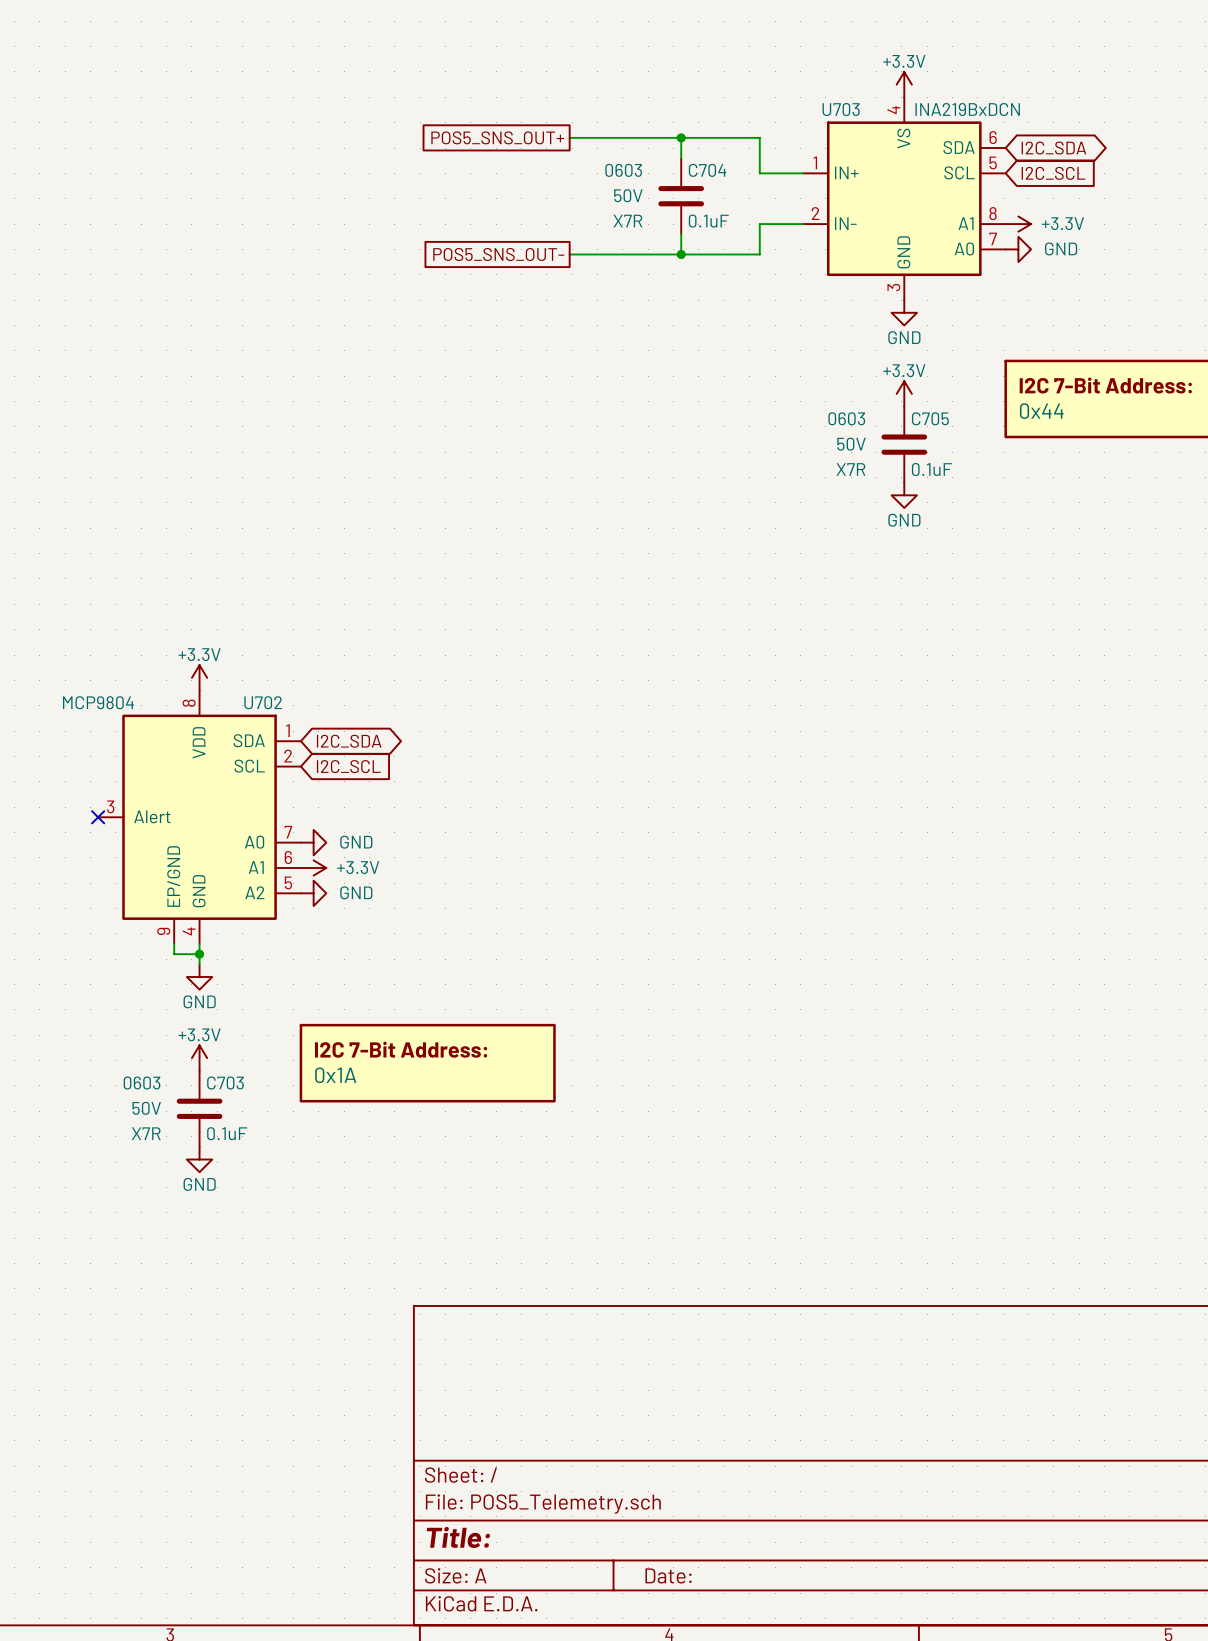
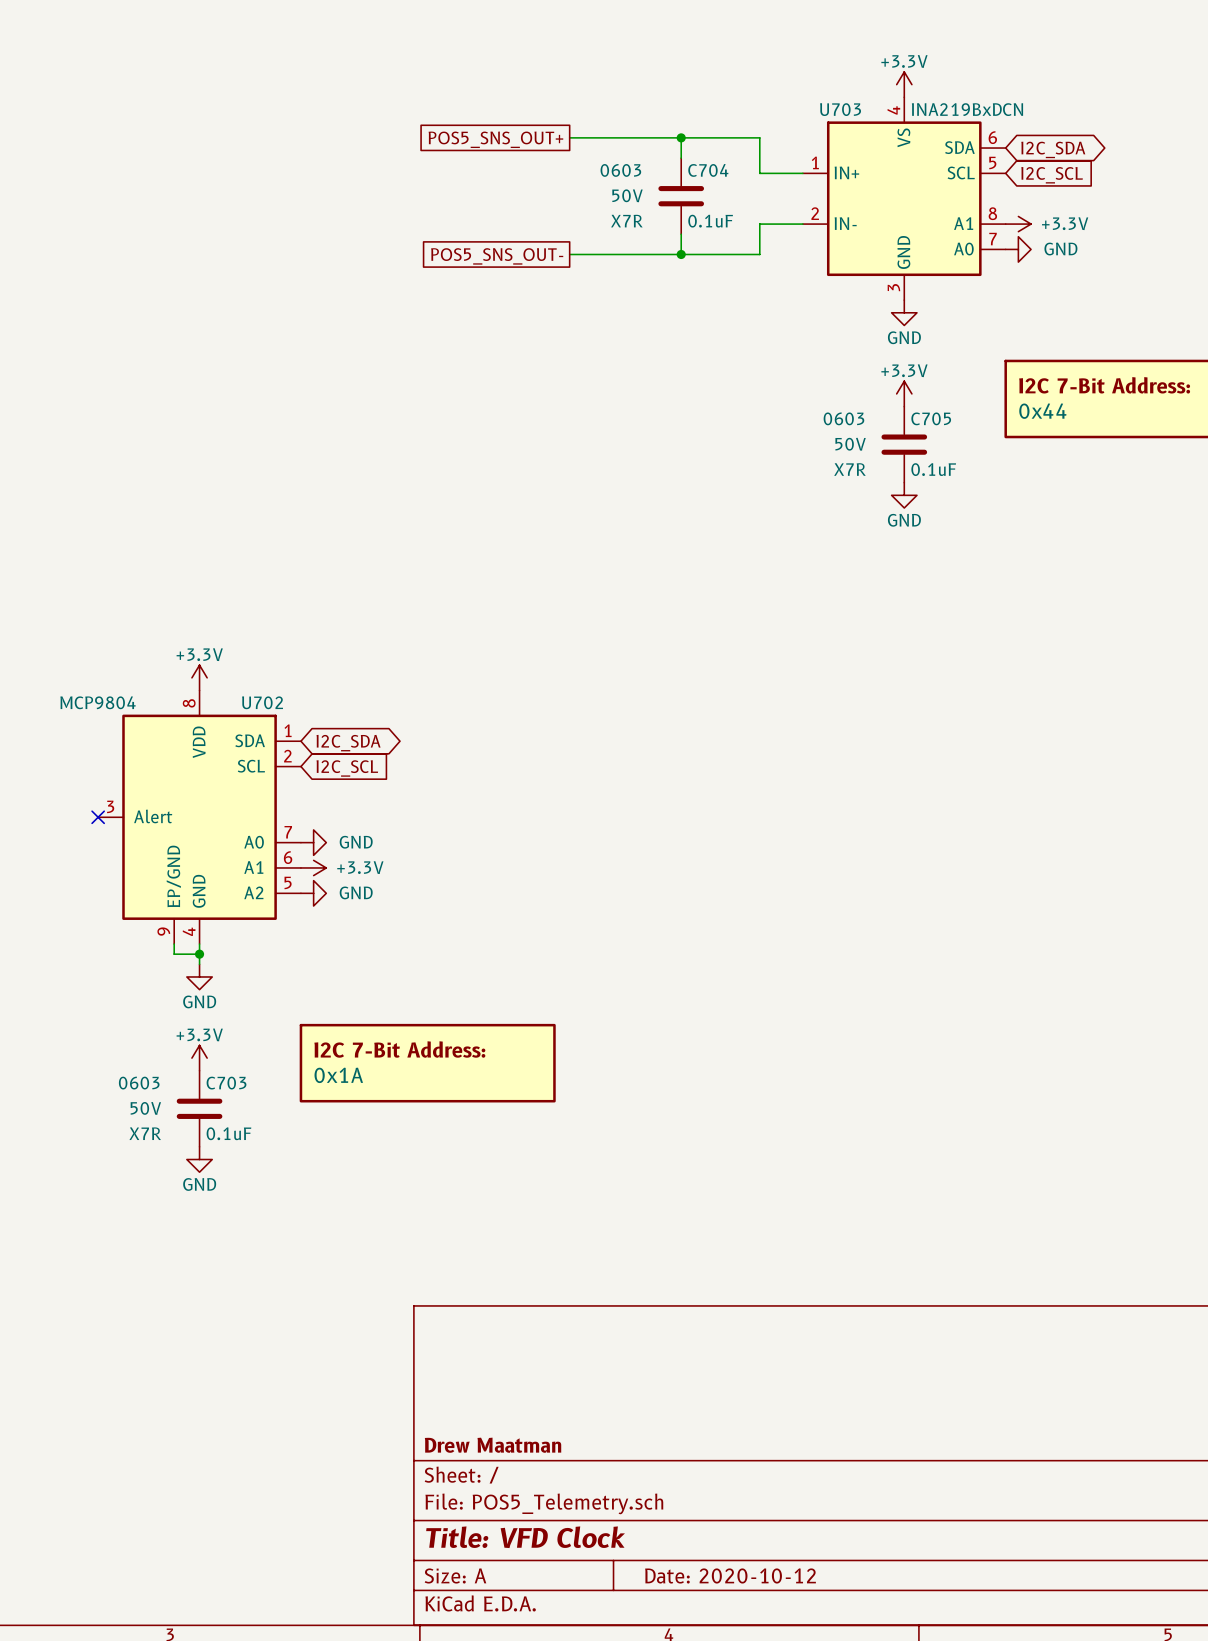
title block: none -> Drew Maatman (493, 1445)
title block: Title: (458, 1537) -> Title: VFD Clock (525, 1537)
title block: Date: (668, 1575) -> Date: 2020-10-12 (730, 1575)

